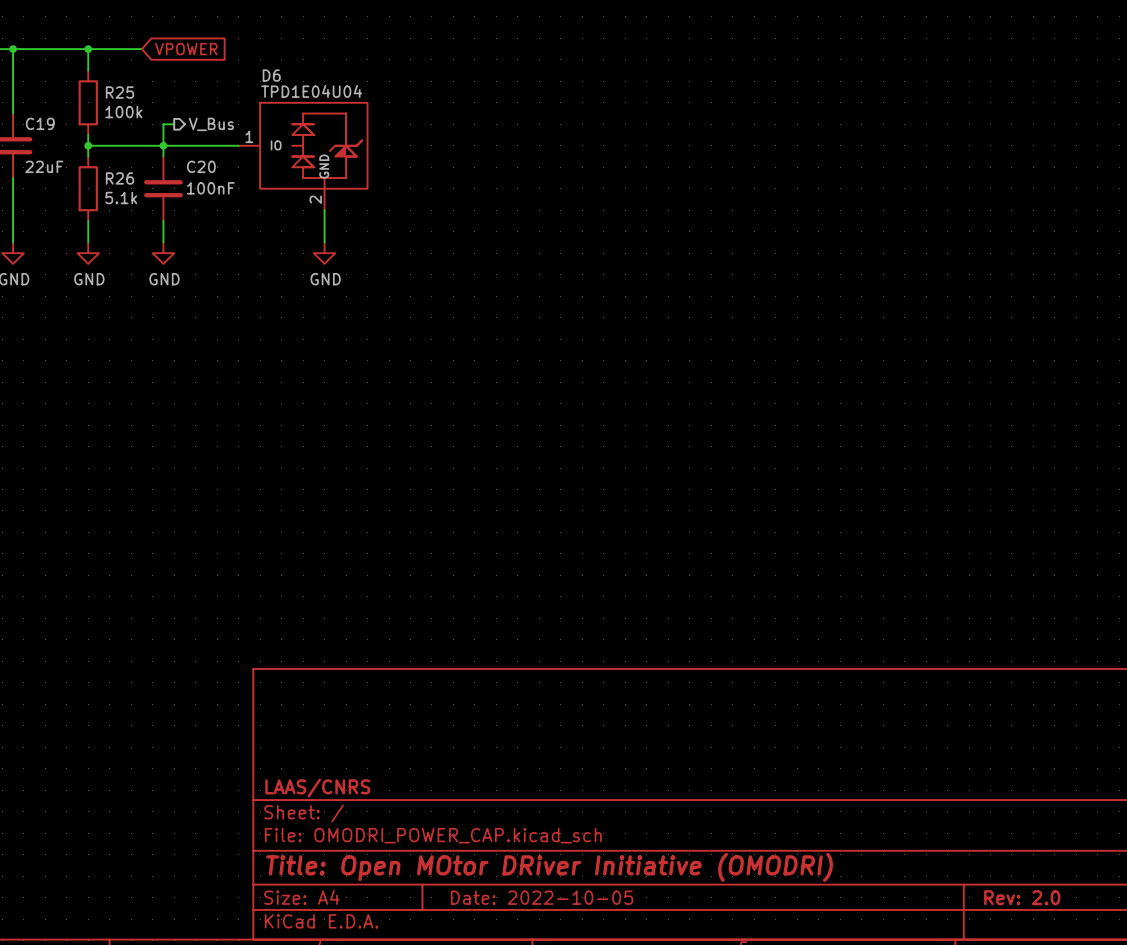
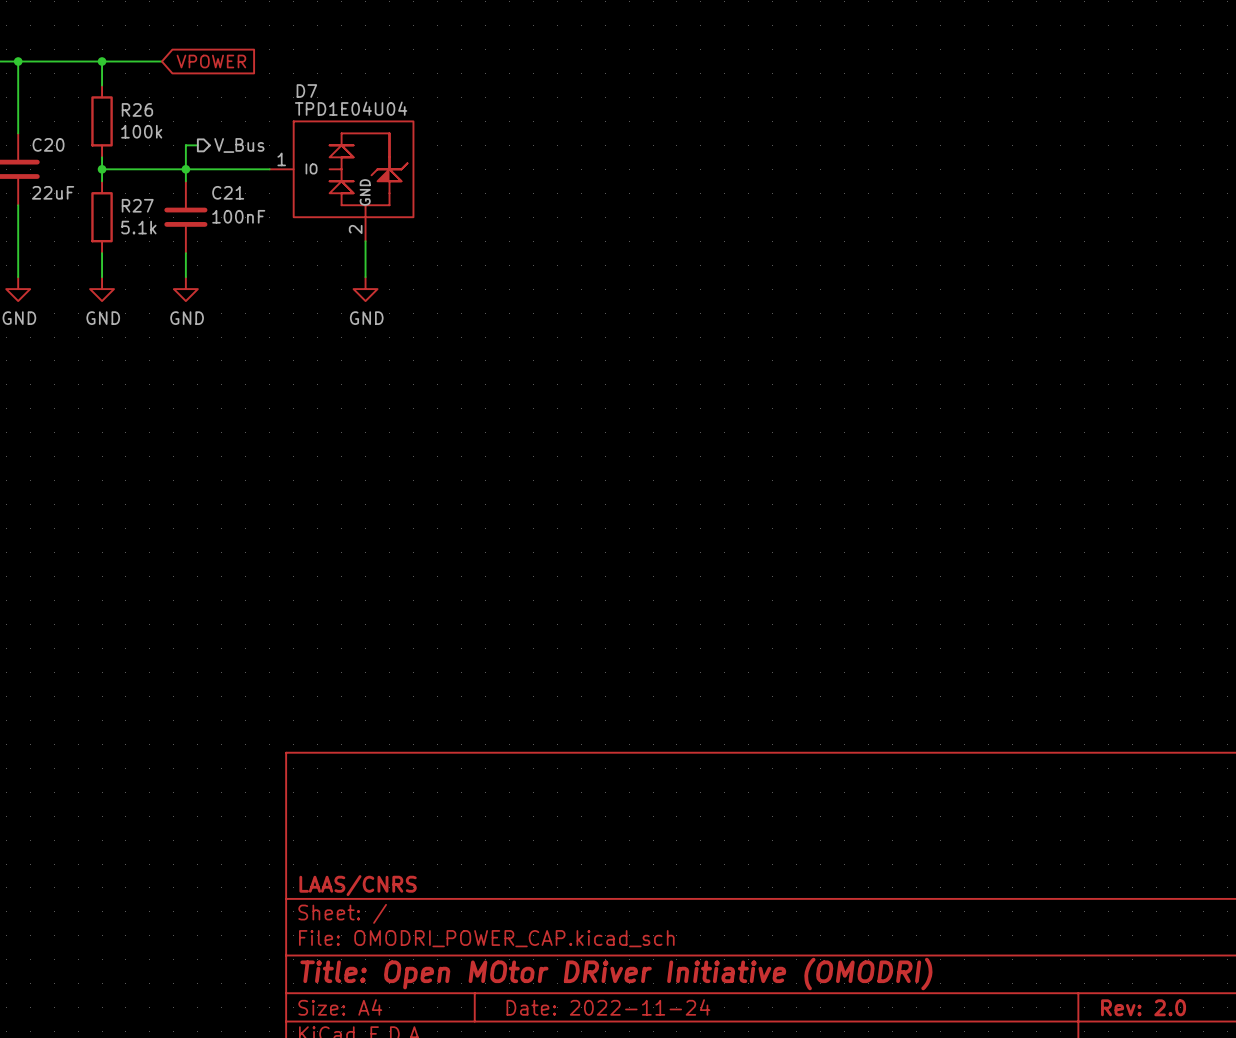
D6 name: D6 (271, 75) -> D7 (306, 91)
R25 name: R25 (120, 92) -> R26 (137, 109)
C19 name: C19 (40, 123) -> C20 (48, 144)
C20 name: C20 (201, 166) -> C21 (228, 192)
R26 name: R26 (120, 178) -> R27 (137, 205)
title block: Date: 2022-10-05 (542, 897) -> Date: 2022-11-24 (608, 1007)

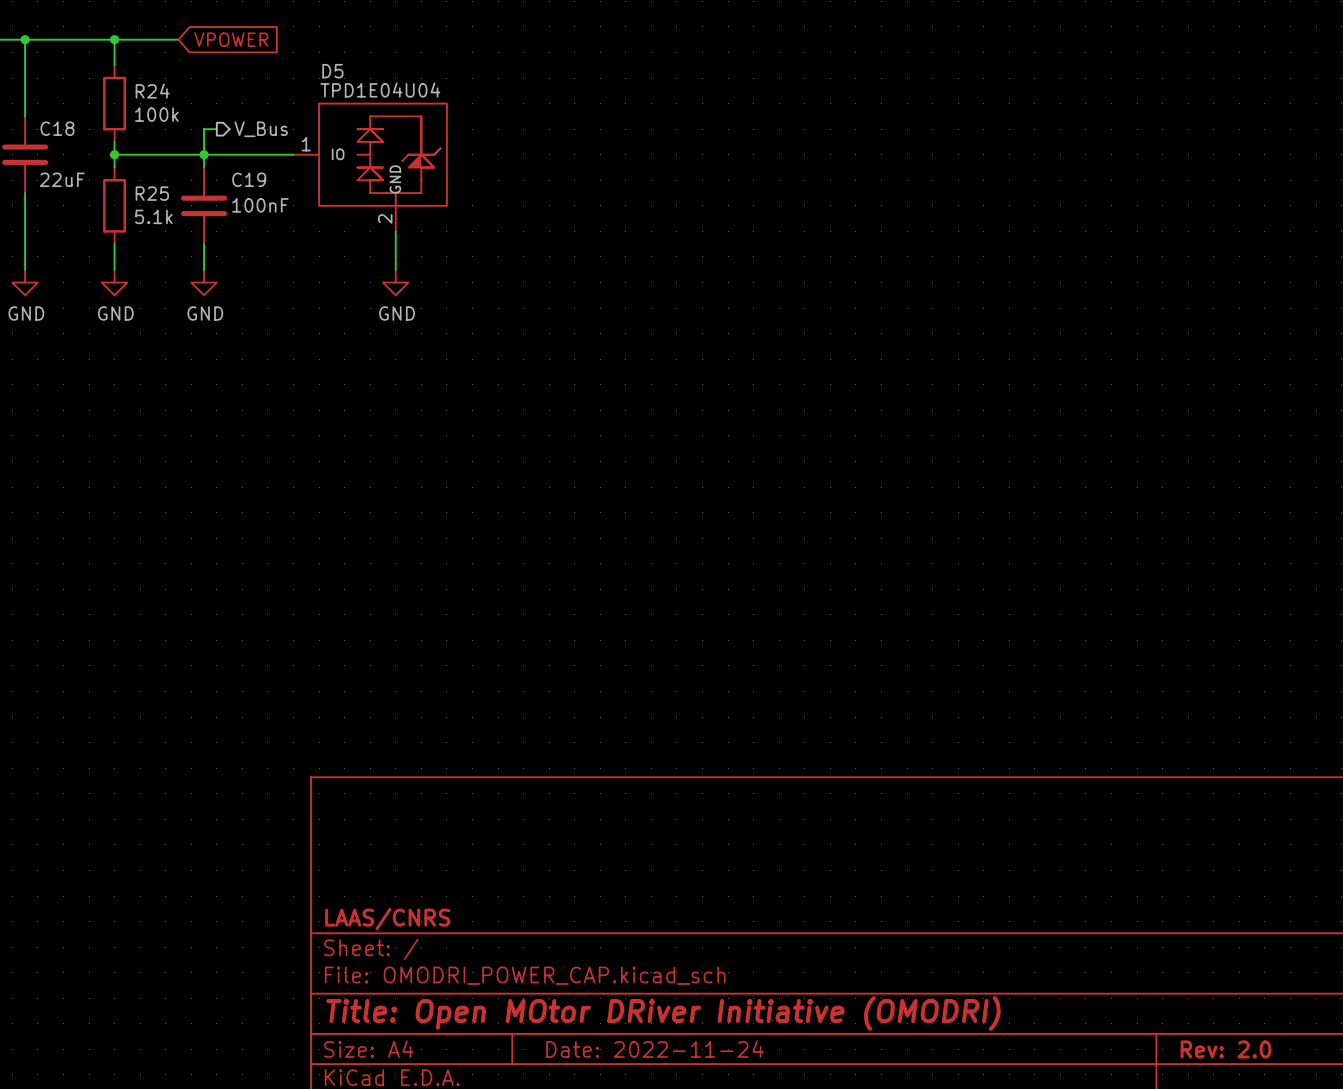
D7 name: D7 (306, 91) -> D5 (332, 71)
R26 name: R26 (137, 109) -> R24 (152, 91)
C20 name: C20 (48, 144) -> C18 (57, 128)
C21 name: C21 (228, 192) -> C19 (249, 179)
R27 name: R27 (137, 205) -> R25 (152, 193)

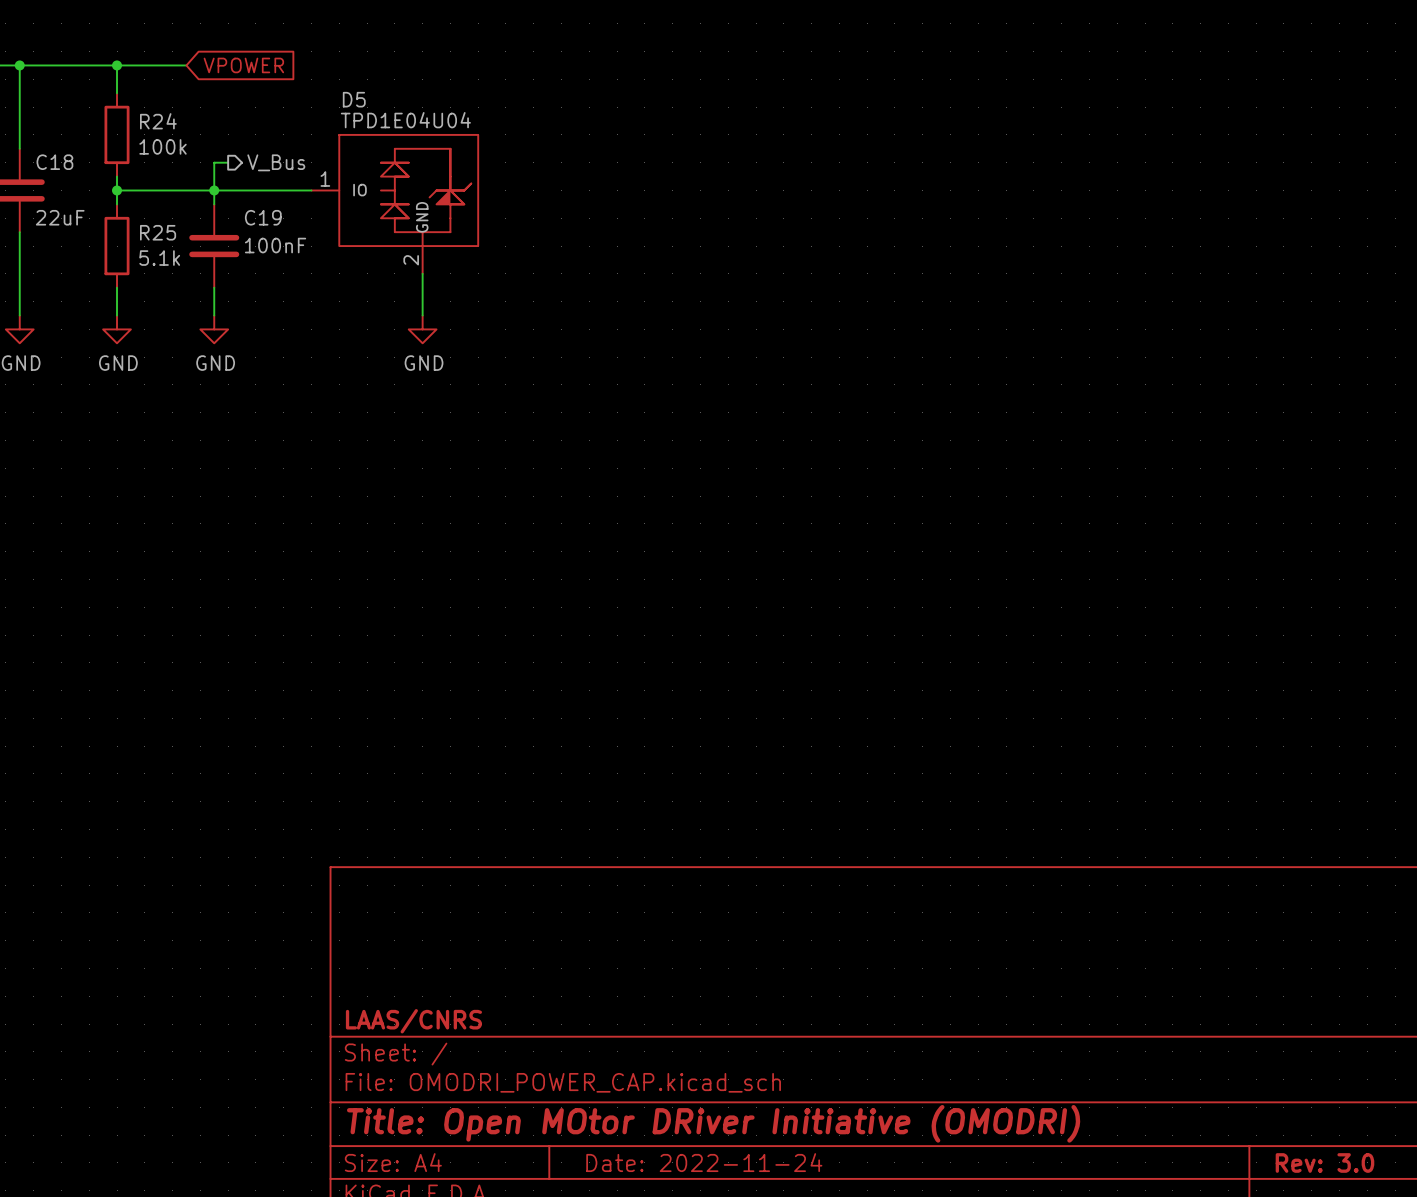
title block: Rev: 2.0 (1225, 1049) -> Rev: 3.0 (1324, 1162)

